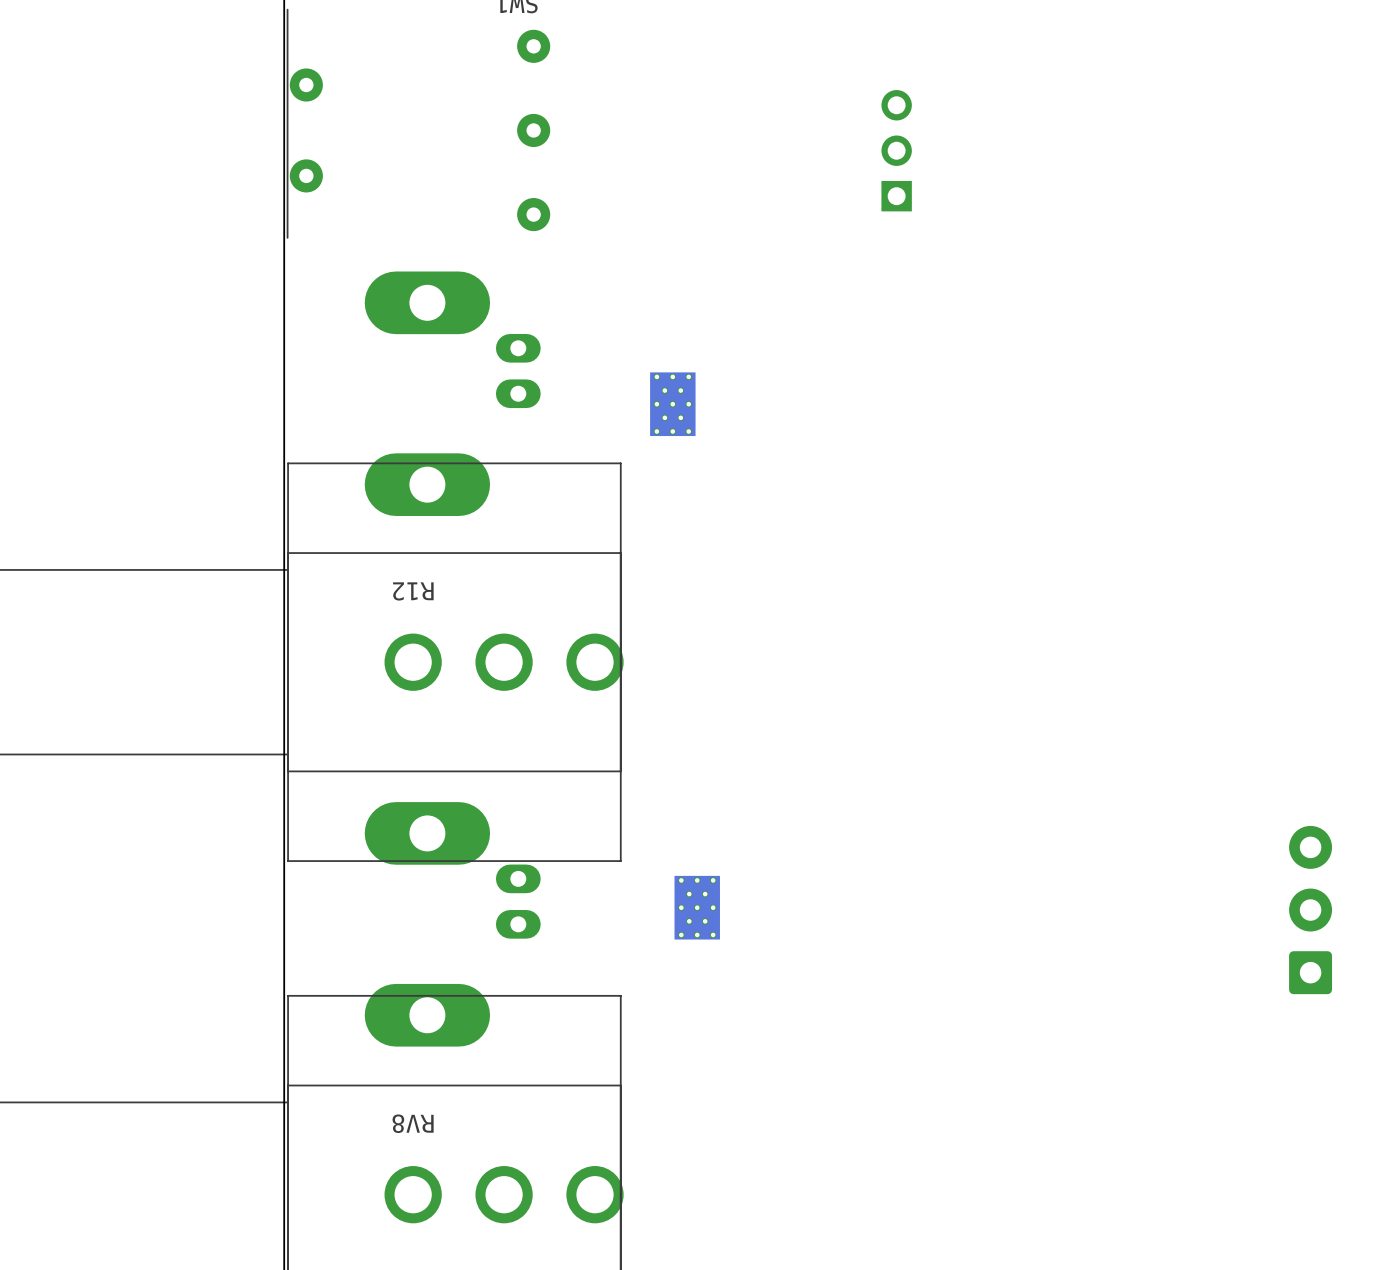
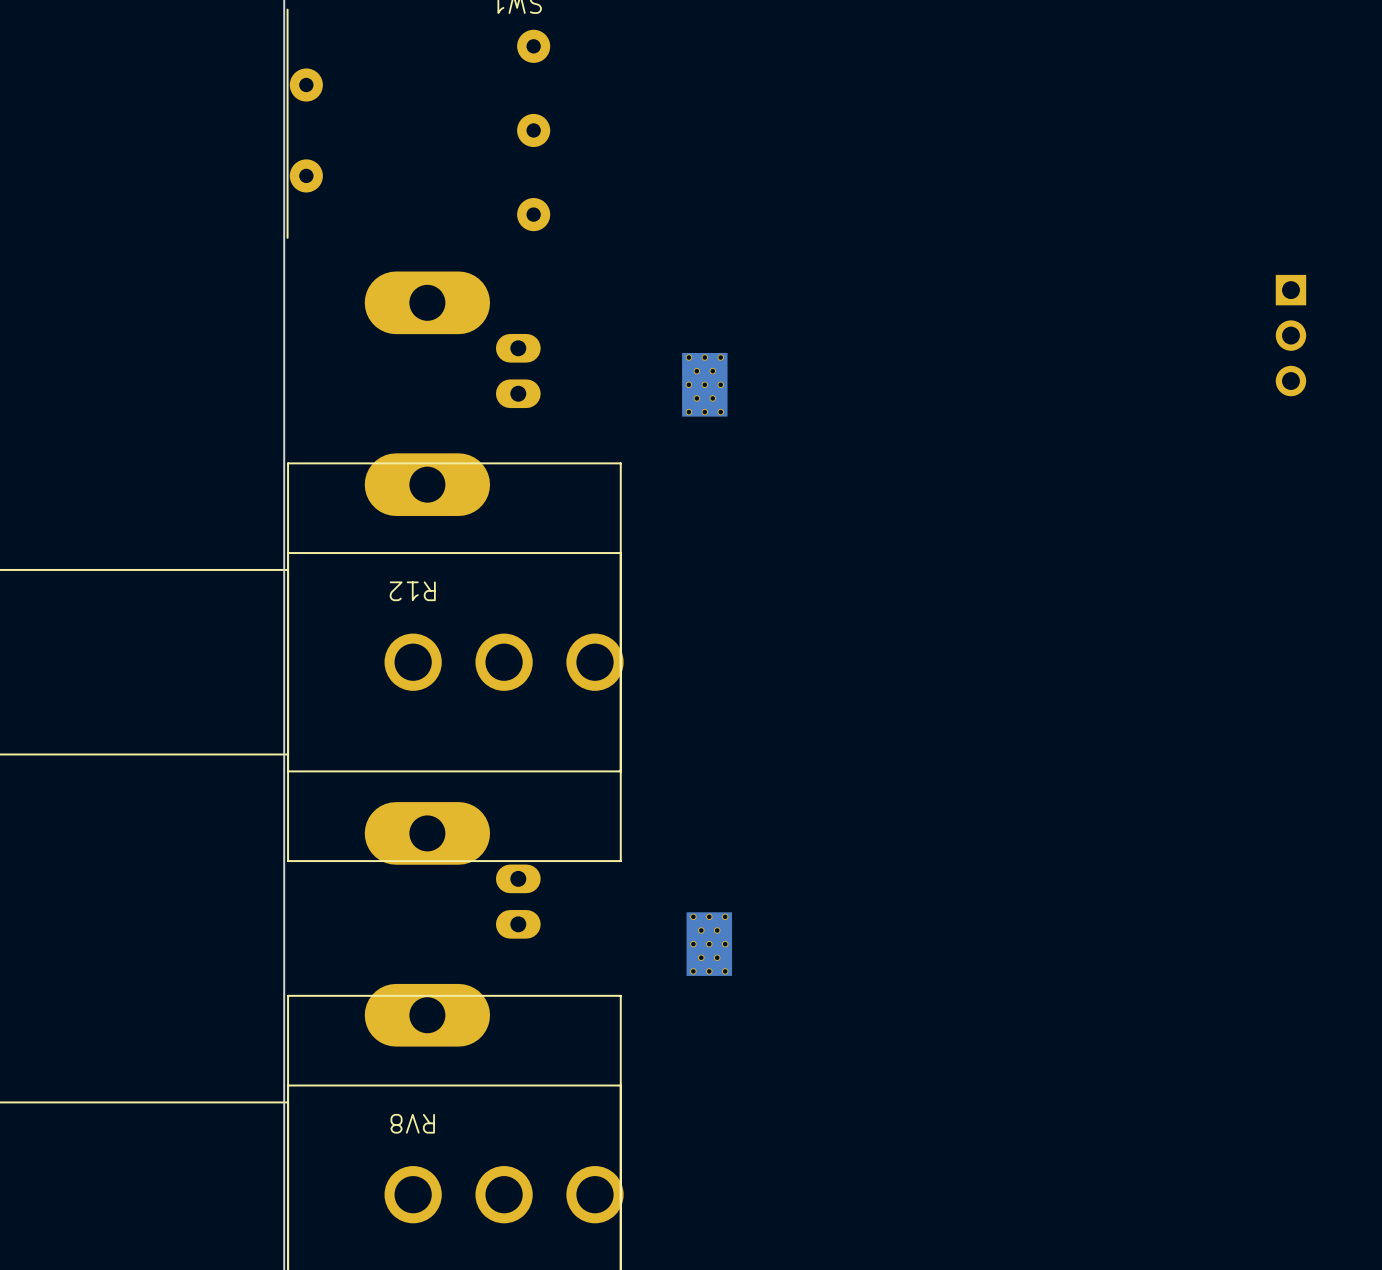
part rotation: 0° (896, 150) -> 180° (1290, 335)
part position: (896, 150) -> (1290, 335)
part position: (672, 404) -> (704, 384)
part position: (697, 907) -> (709, 944)
part: (1310, 910) -> none

